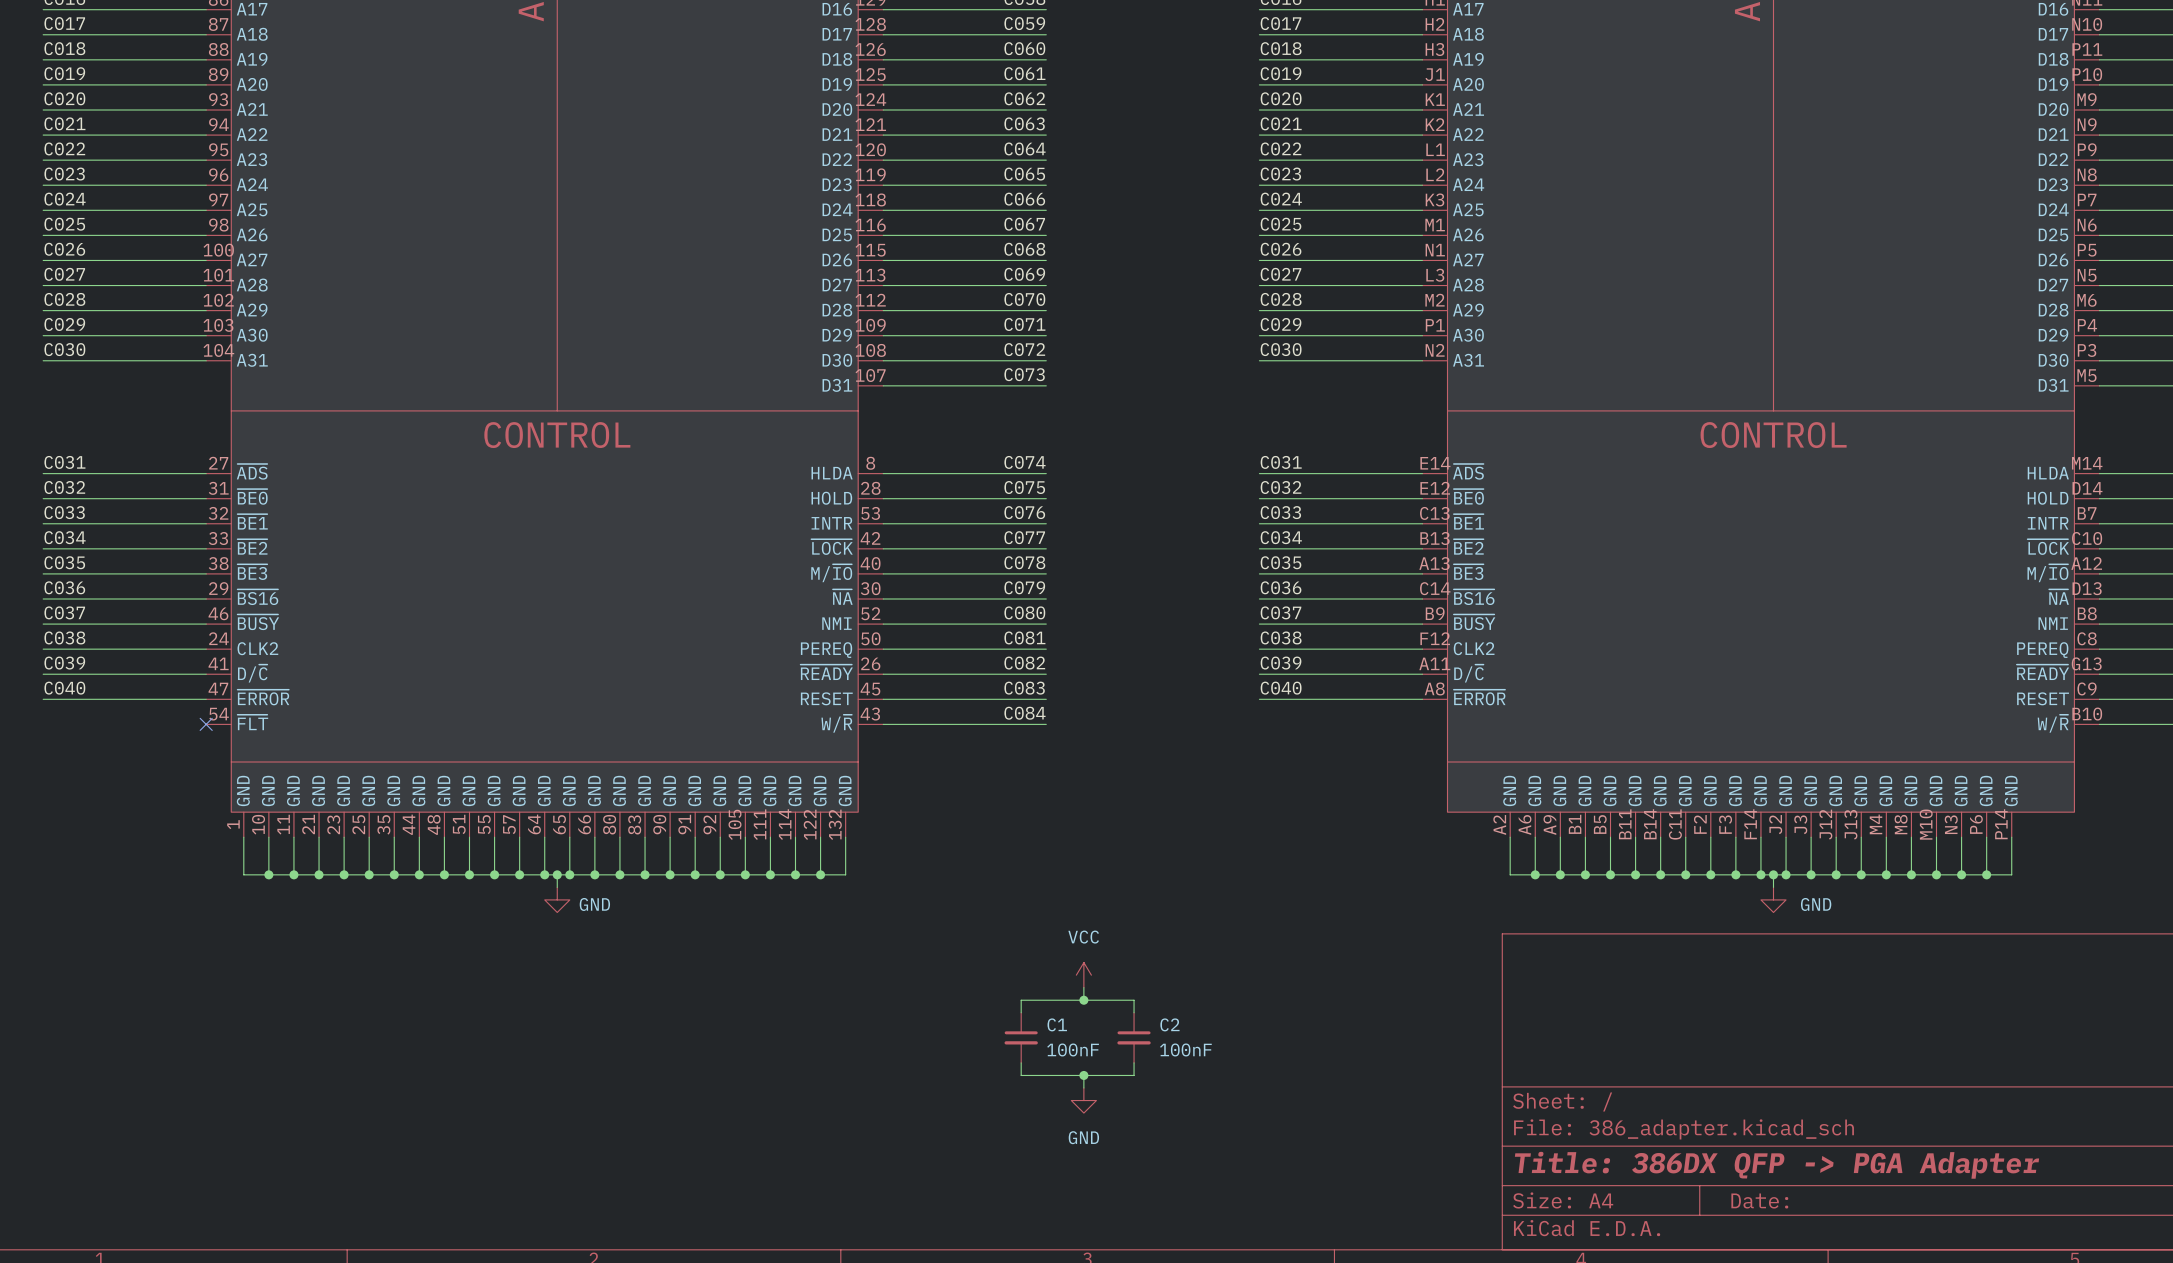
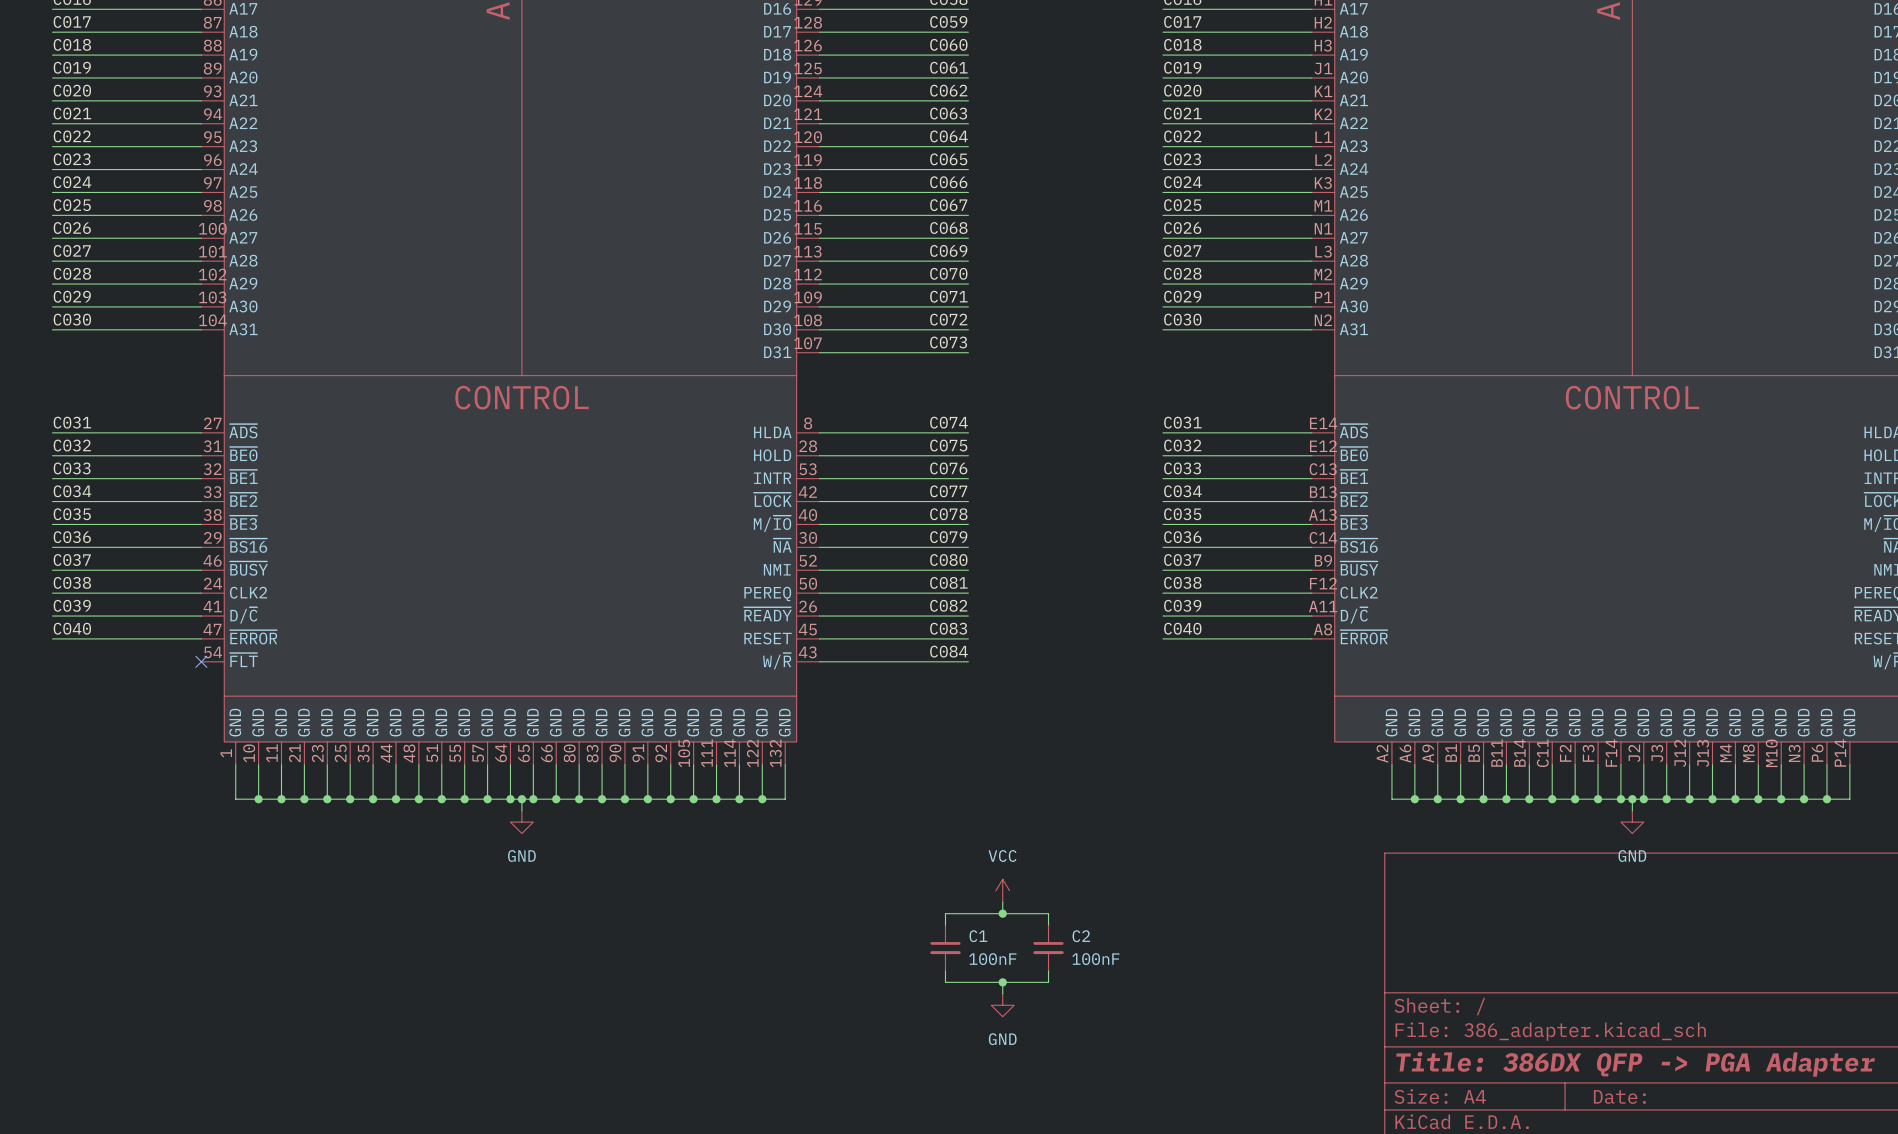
power symbol text position: GND (594, 904) -> GND (521, 856)
power symbol text position: GND (1816, 904) -> GND (1632, 856)

